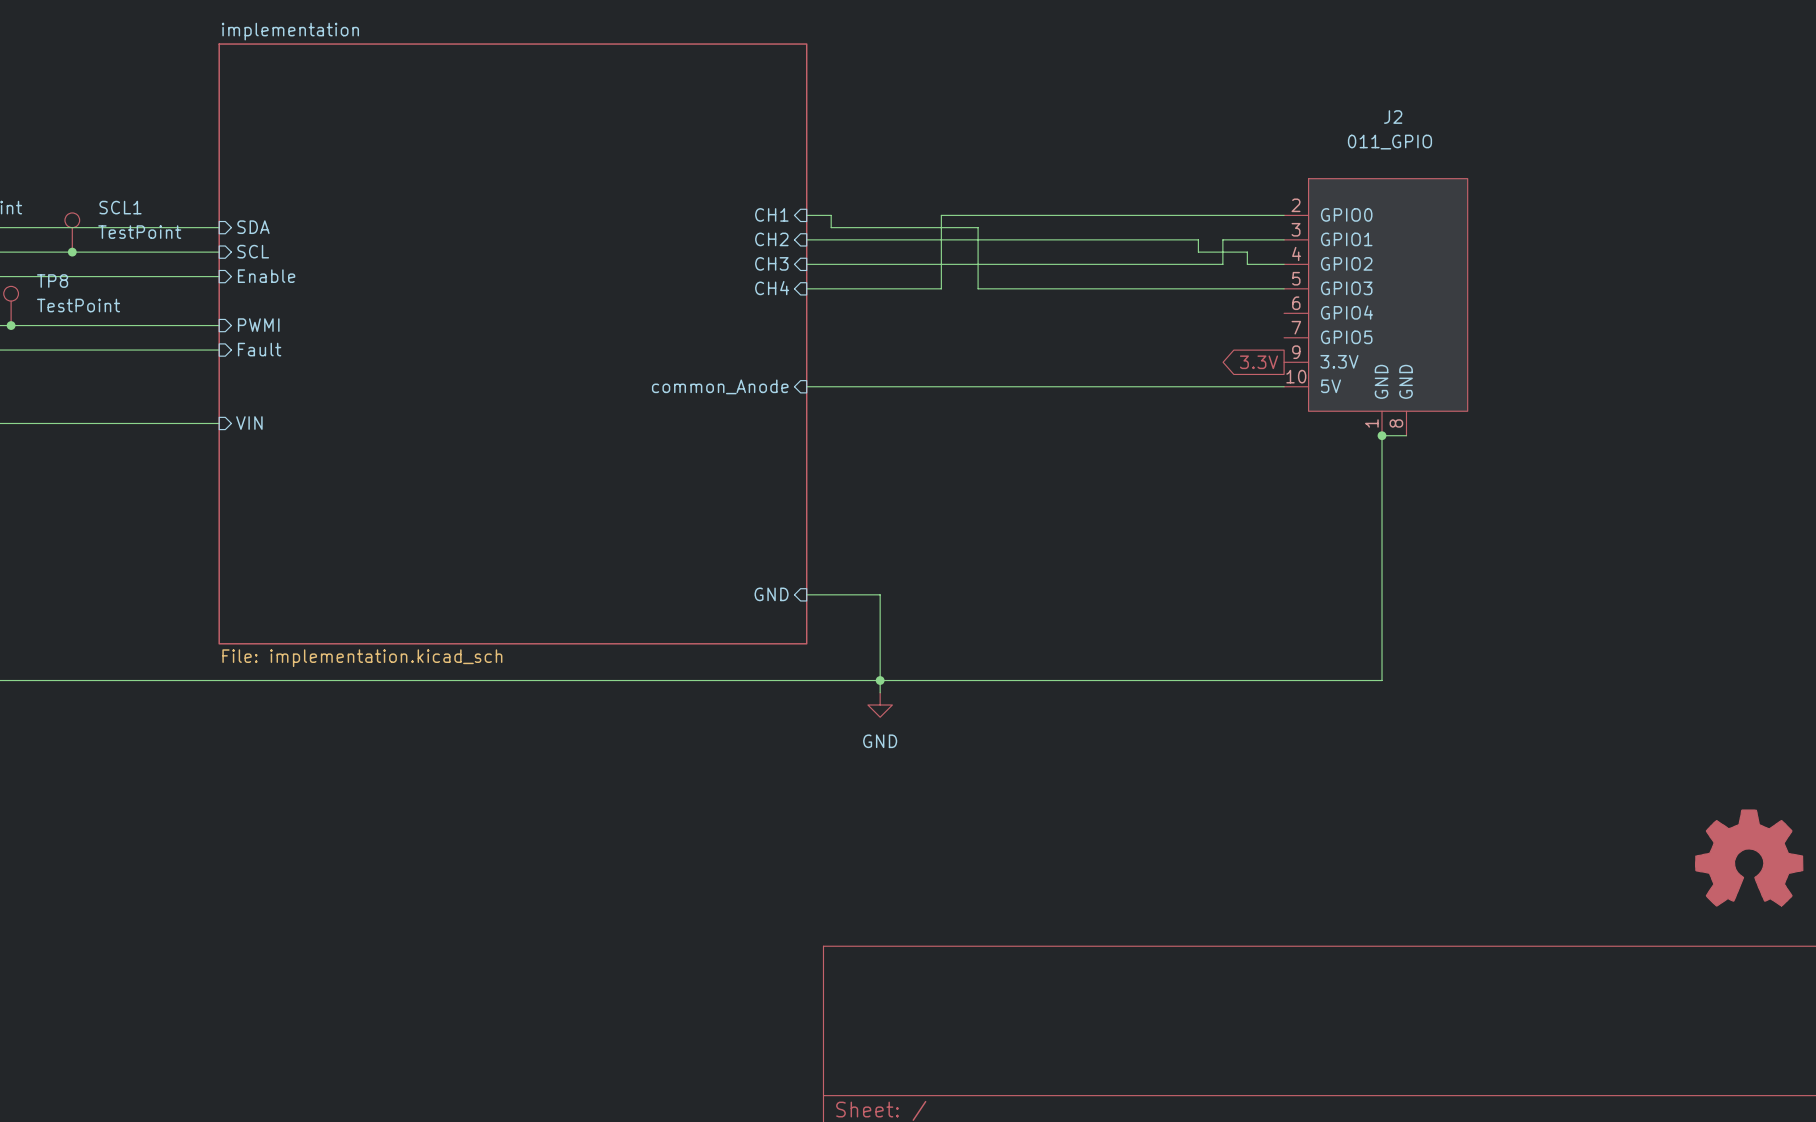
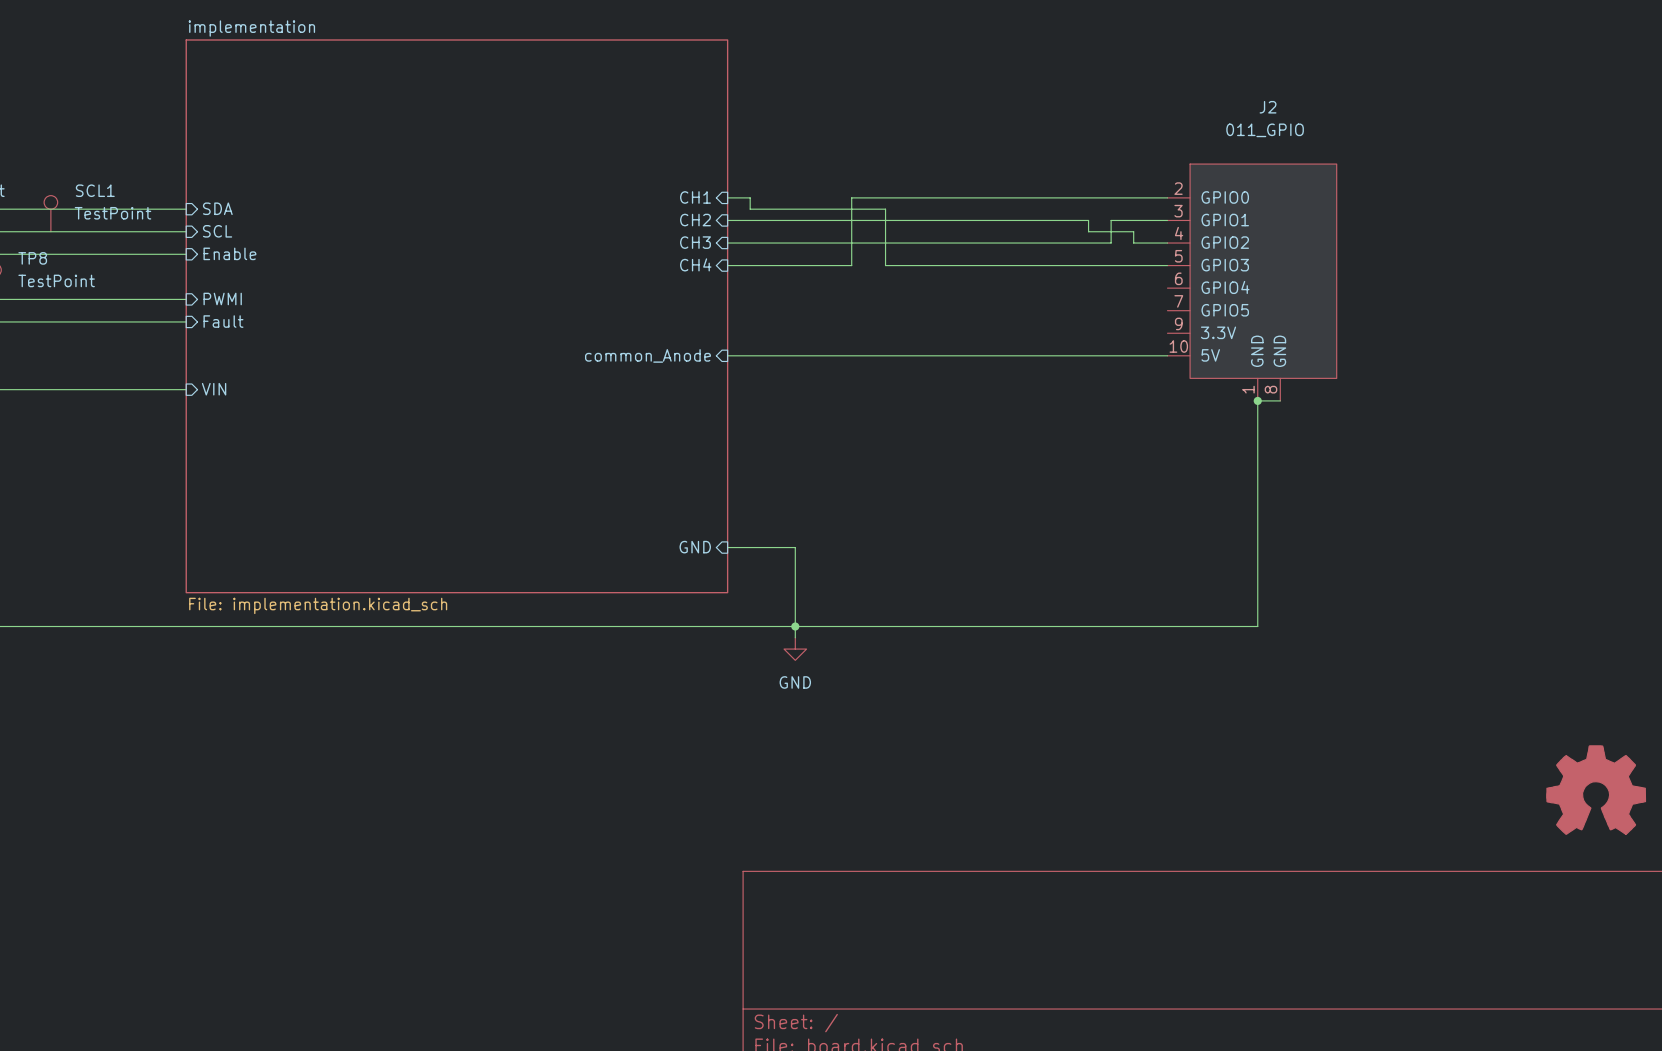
junction: (72, 252) -> none
global label: 3.3V (1259, 362) -> none

